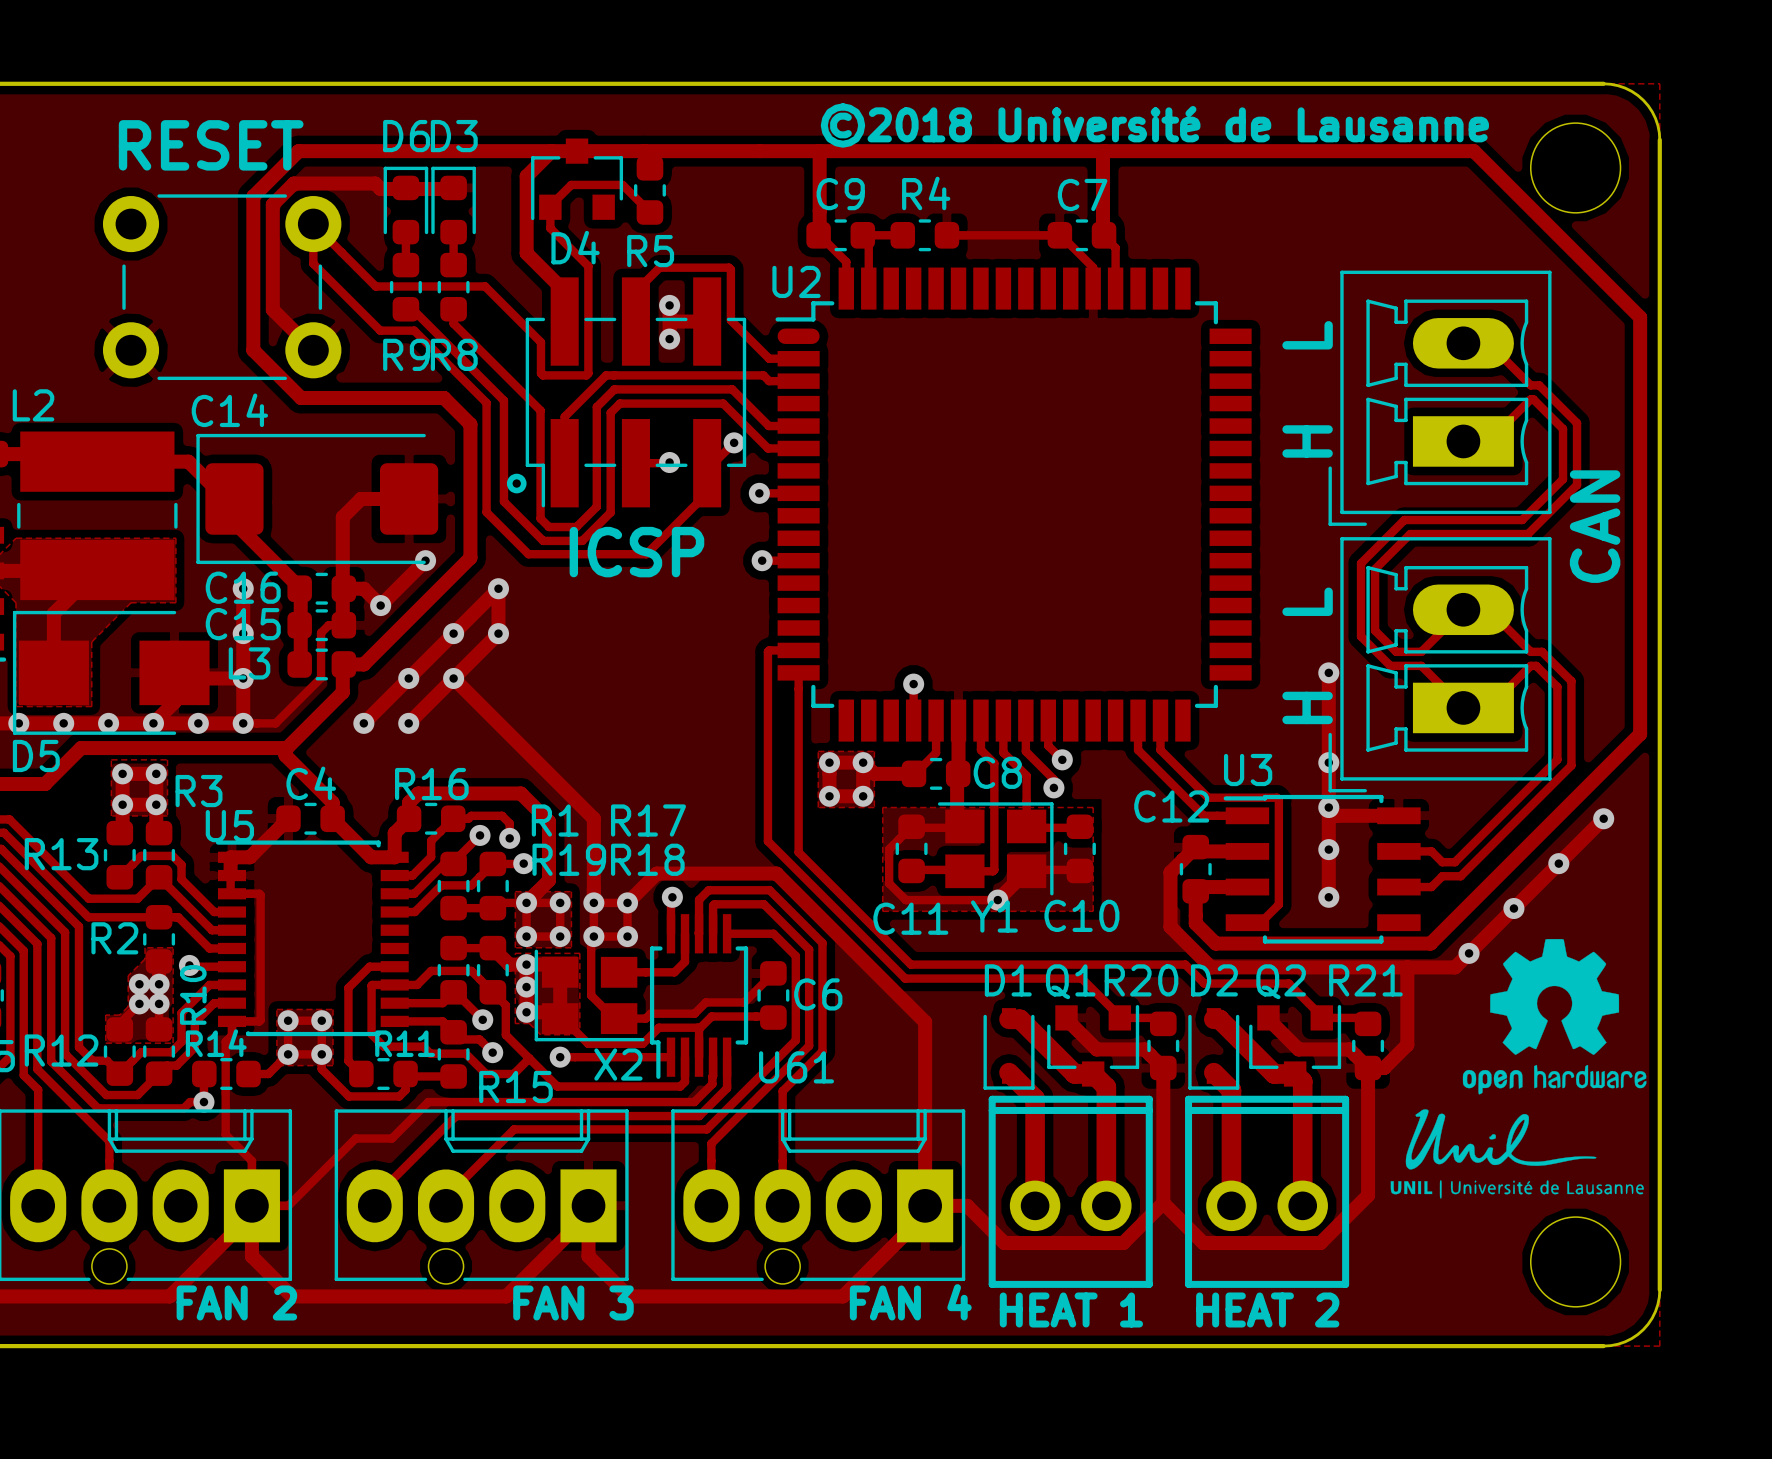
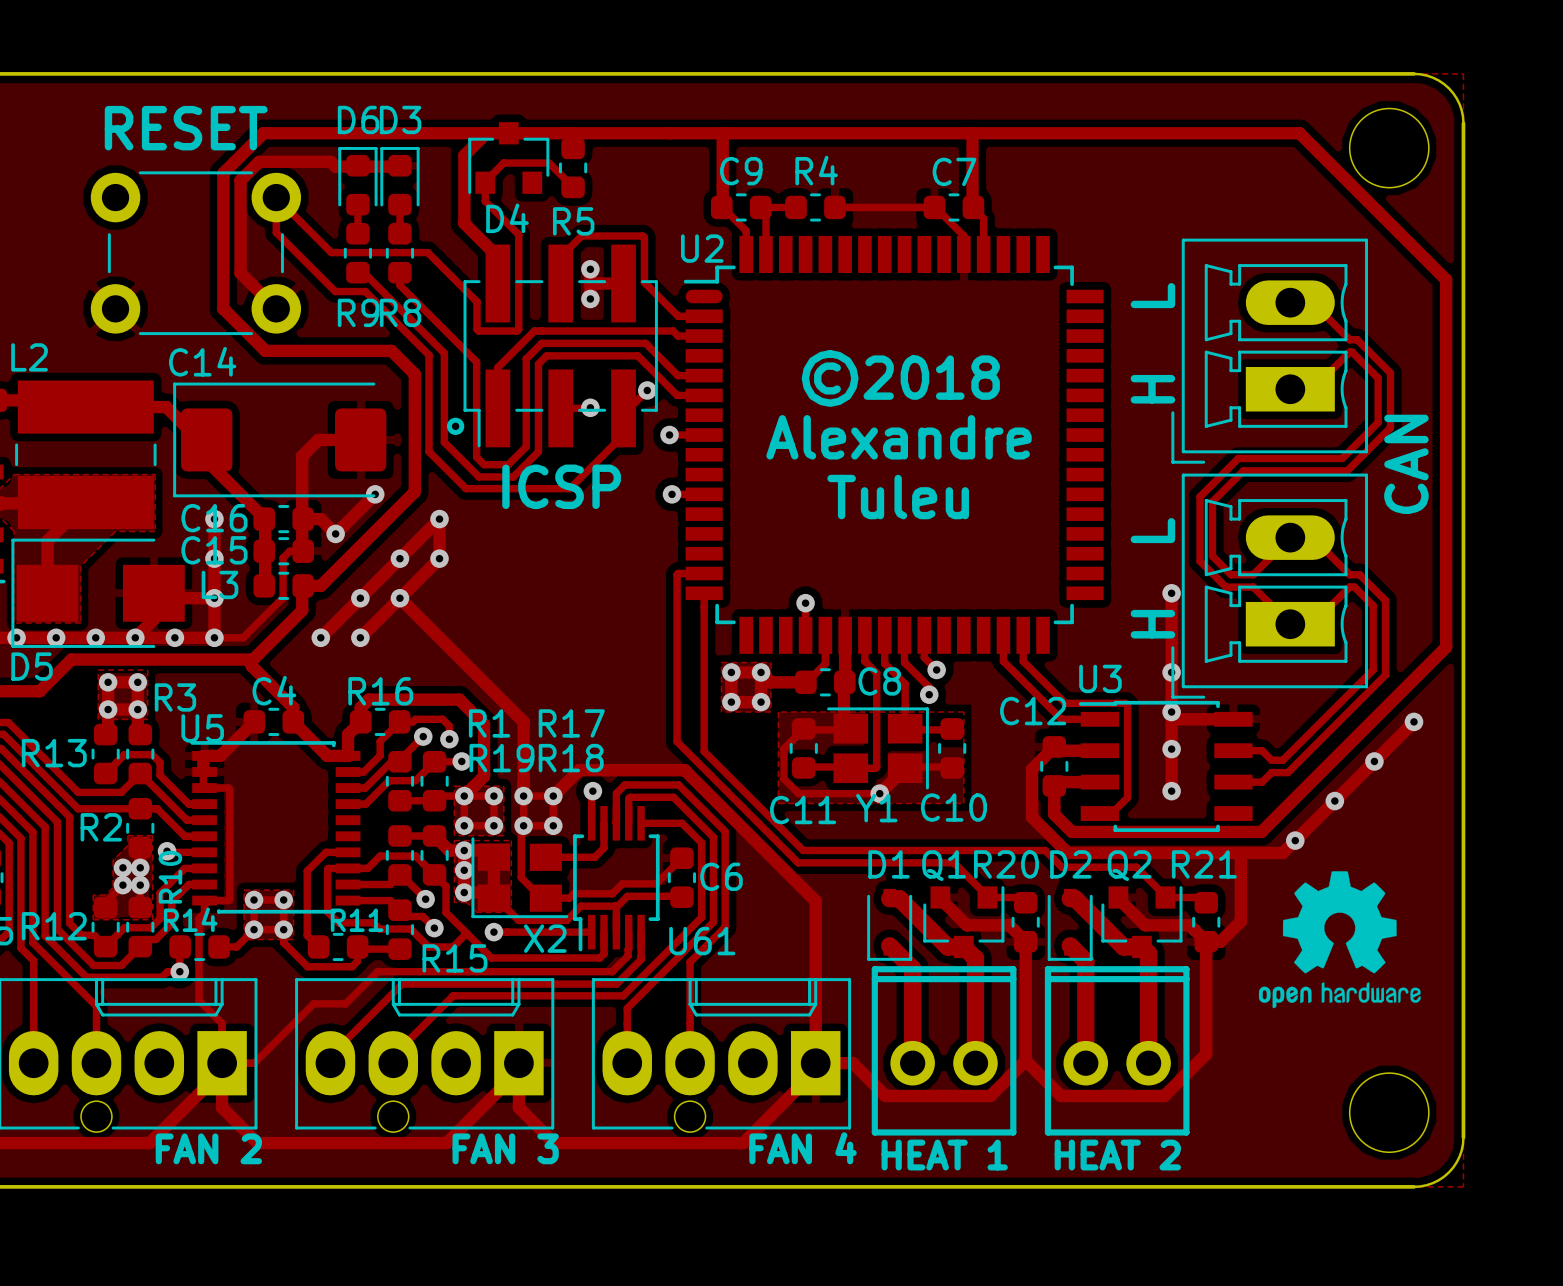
text: ©2018 Université de Lausanne (1154, 125) -> none
text: none -> ©2018 (900, 378)
text: none -> Alexandre (899, 437)
text: none -> Tuleu (898, 497)
drawing position: (1554, 1016) -> (1339, 939)
drawing: [1390, 1109, 1644, 1199] -> none

